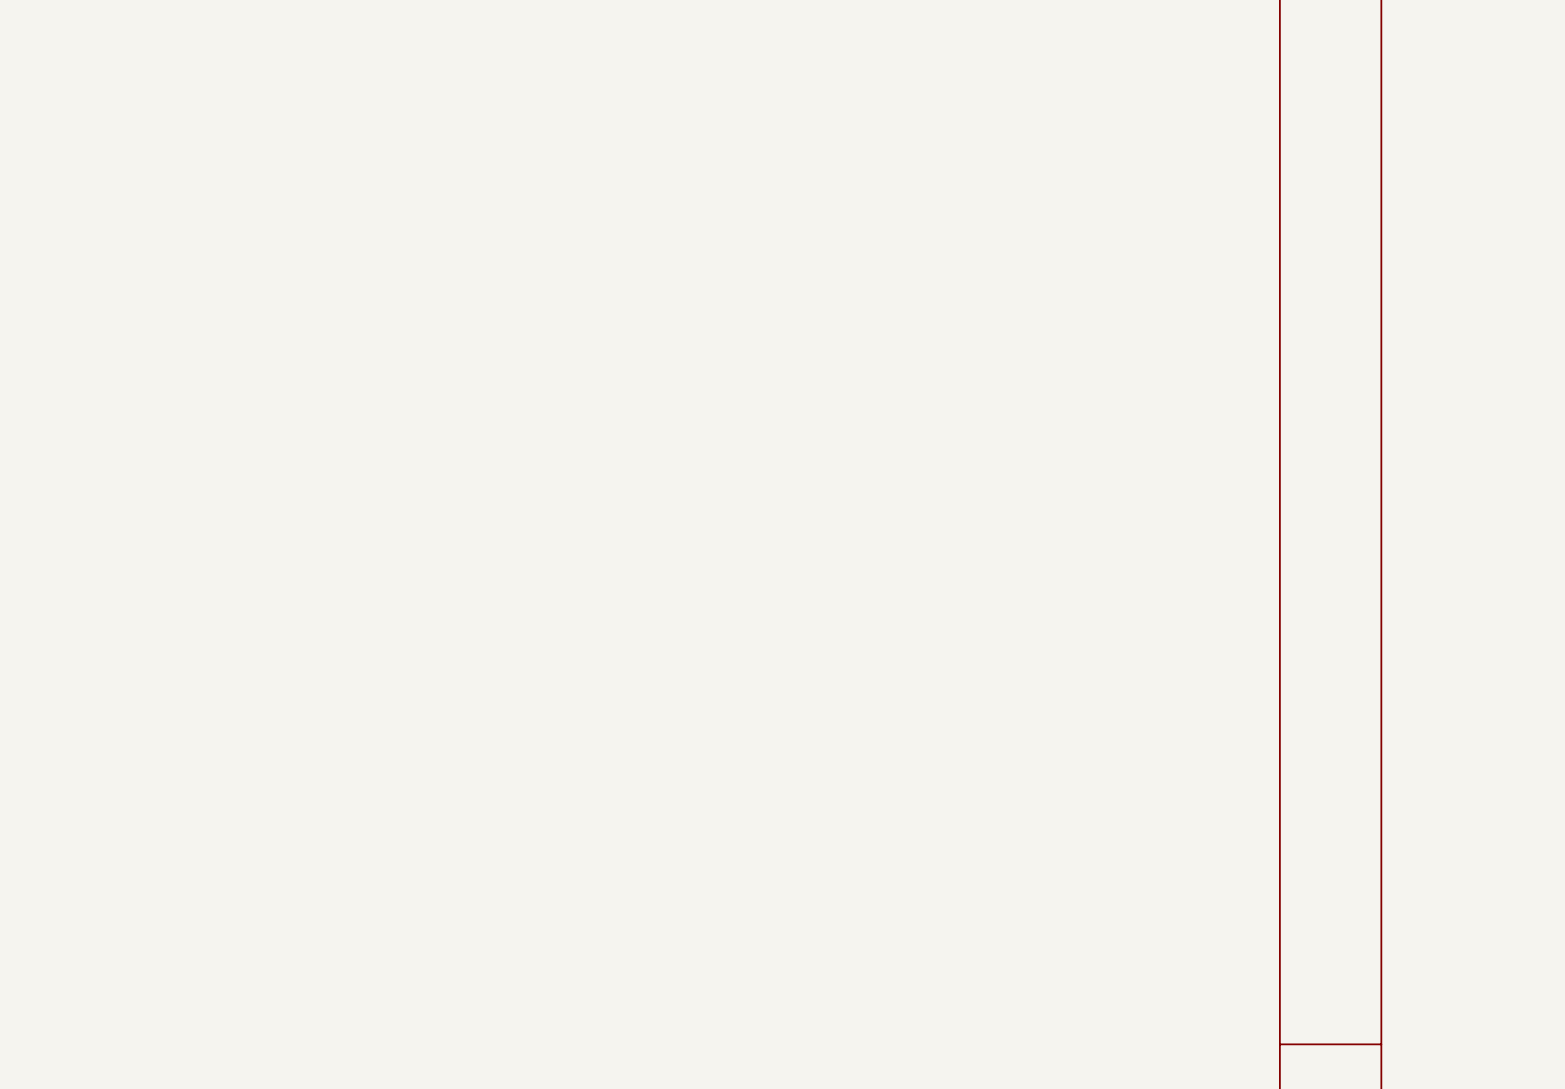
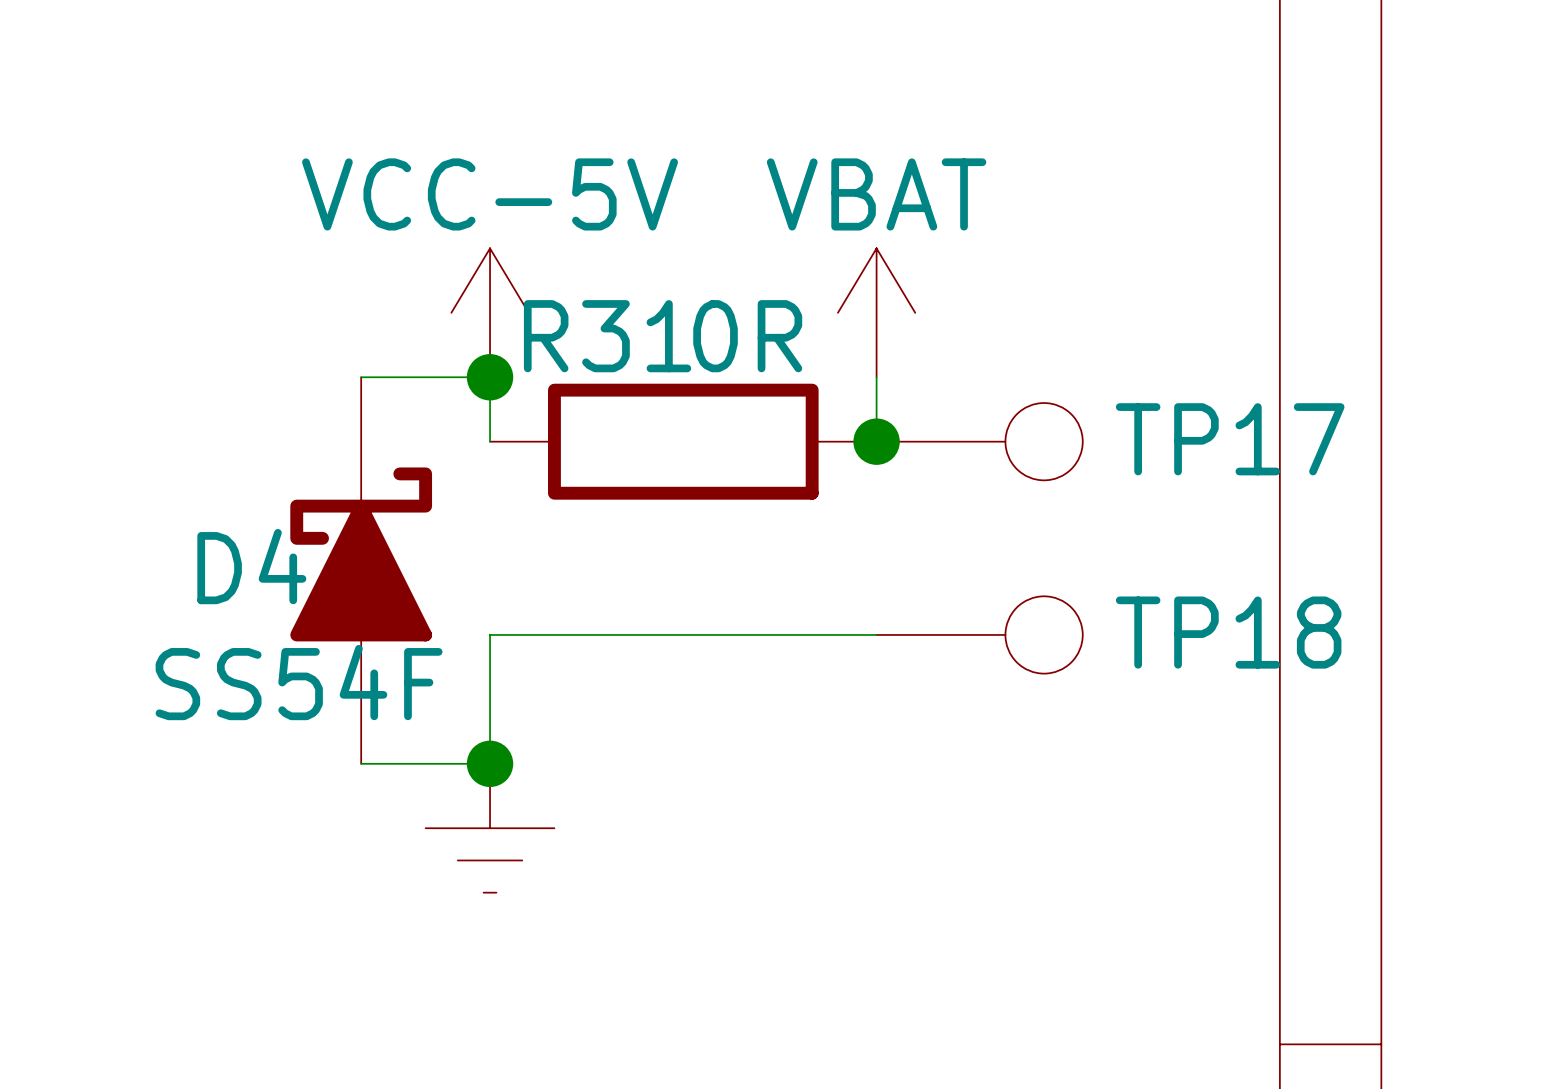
power symbol: none -> VCC-5V (490, 312)
power symbol: none -> VBAT (876, 312)
wire: none -> (361, 377) (490, 377) (490, 441)
junction: none -> (490, 377)
wire: none -> (876, 377) (876, 441)
R31: none -> 0R (683, 441)
junction: none -> (876, 441)
TP17: none -> (979, 441)
D4: none -> SS54F (361, 570)
wire: none -> (876, 634) (490, 634) (490, 763) (361, 763)
TP18: none -> (979, 634)
junction: none -> (490, 763)
power symbol: none -> (490, 828)

